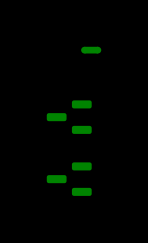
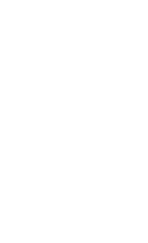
part: (91, 50) -> none
part: (69, 117) -> none
part: (69, 179) -> none

